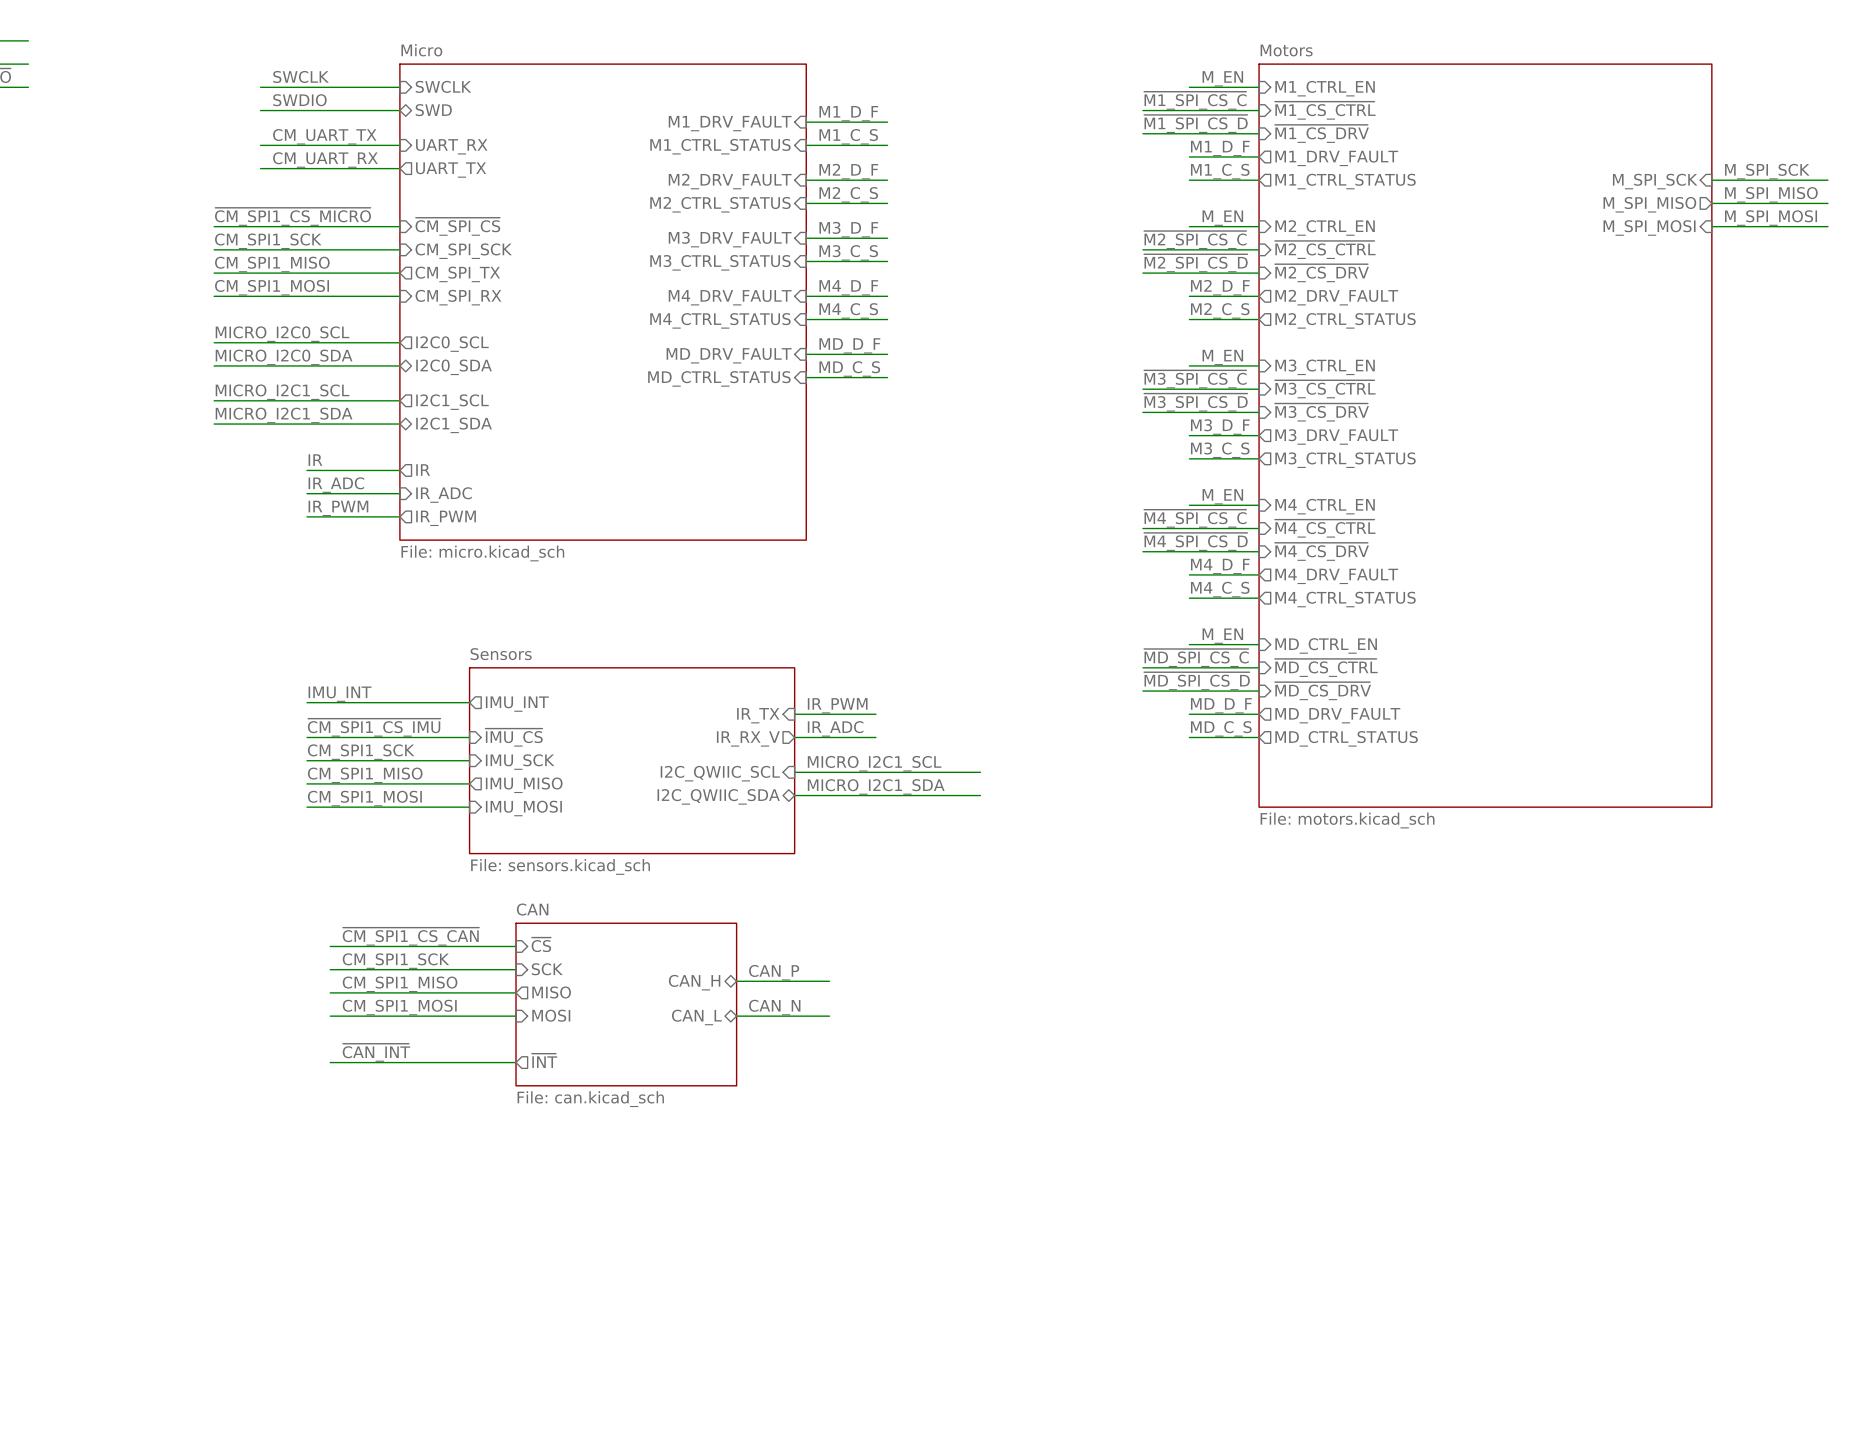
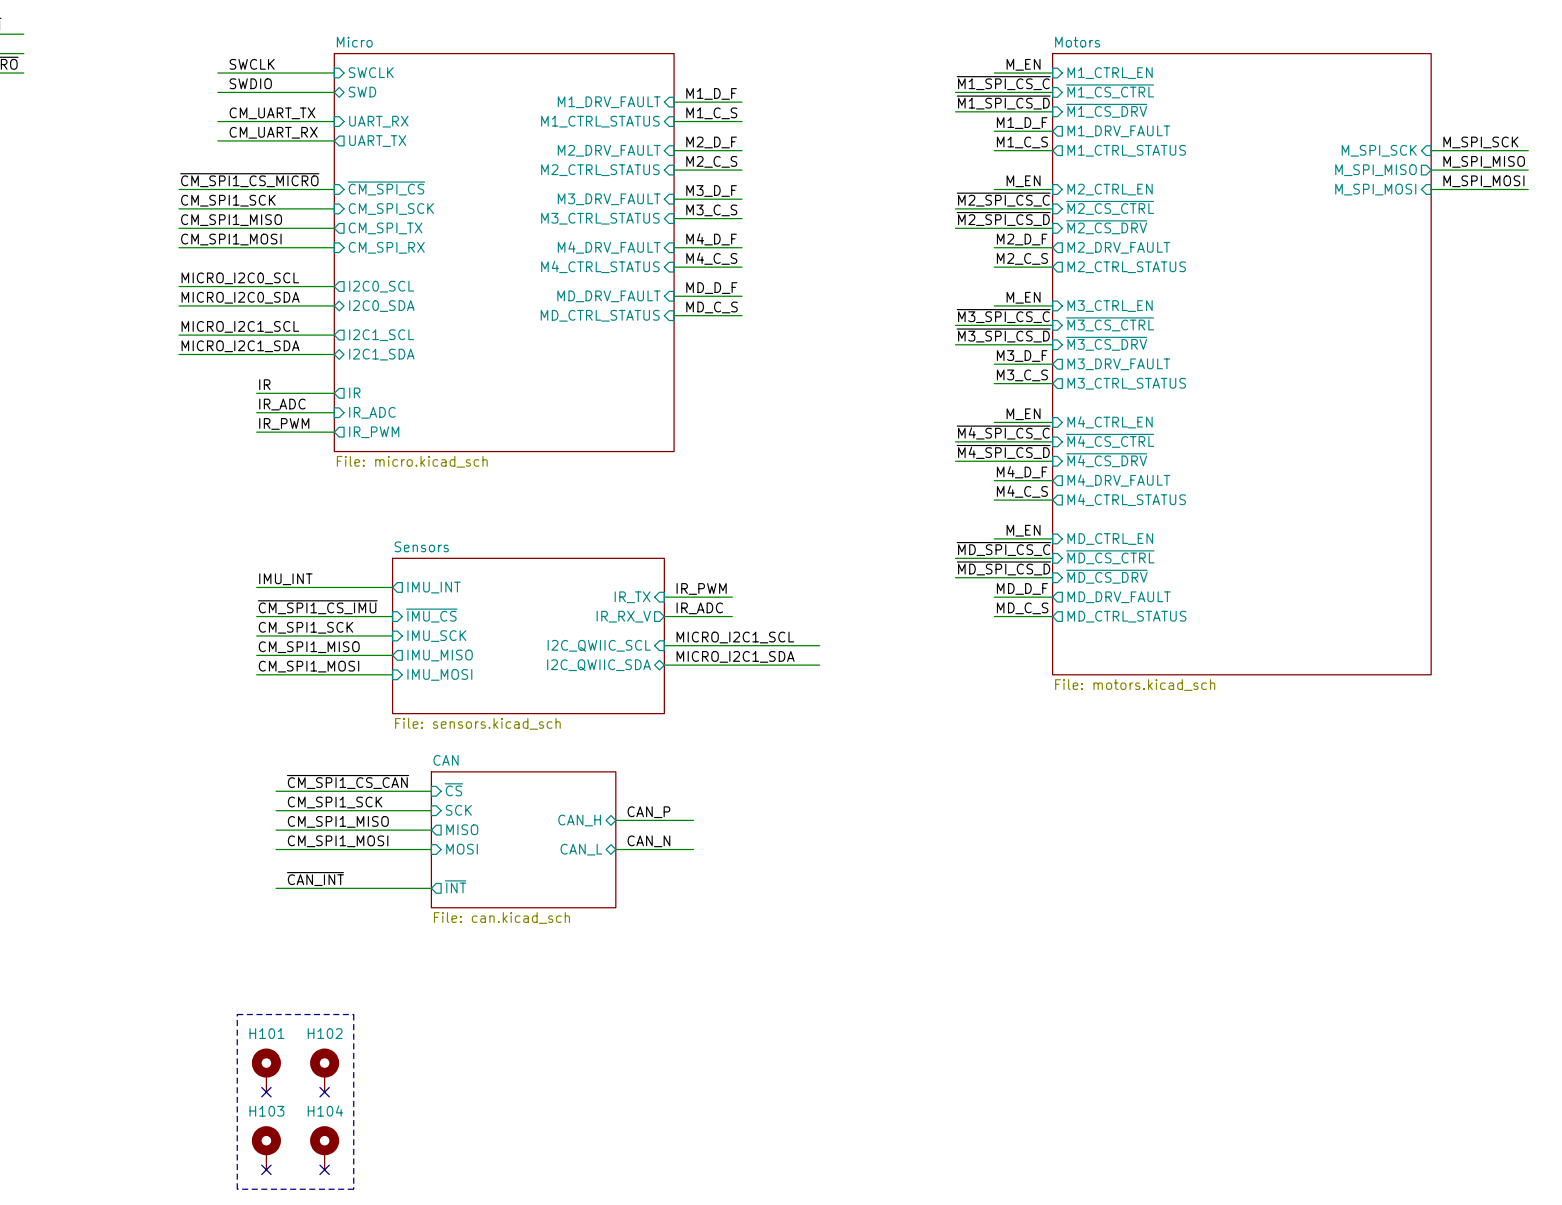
line: none -> (237, 1014) (353, 1014) (353, 1189) (237, 1189) (237, 1014)
H101: none -> (266, 1070)
H102: none -> (324, 1070)
no-connect mark: none -> (266, 1092)
no-connect mark: none -> (324, 1092)
H103: none -> (266, 1147)
H104: none -> (324, 1147)
no-connect mark: none -> (266, 1169)
no-connect mark: none -> (324, 1169)

